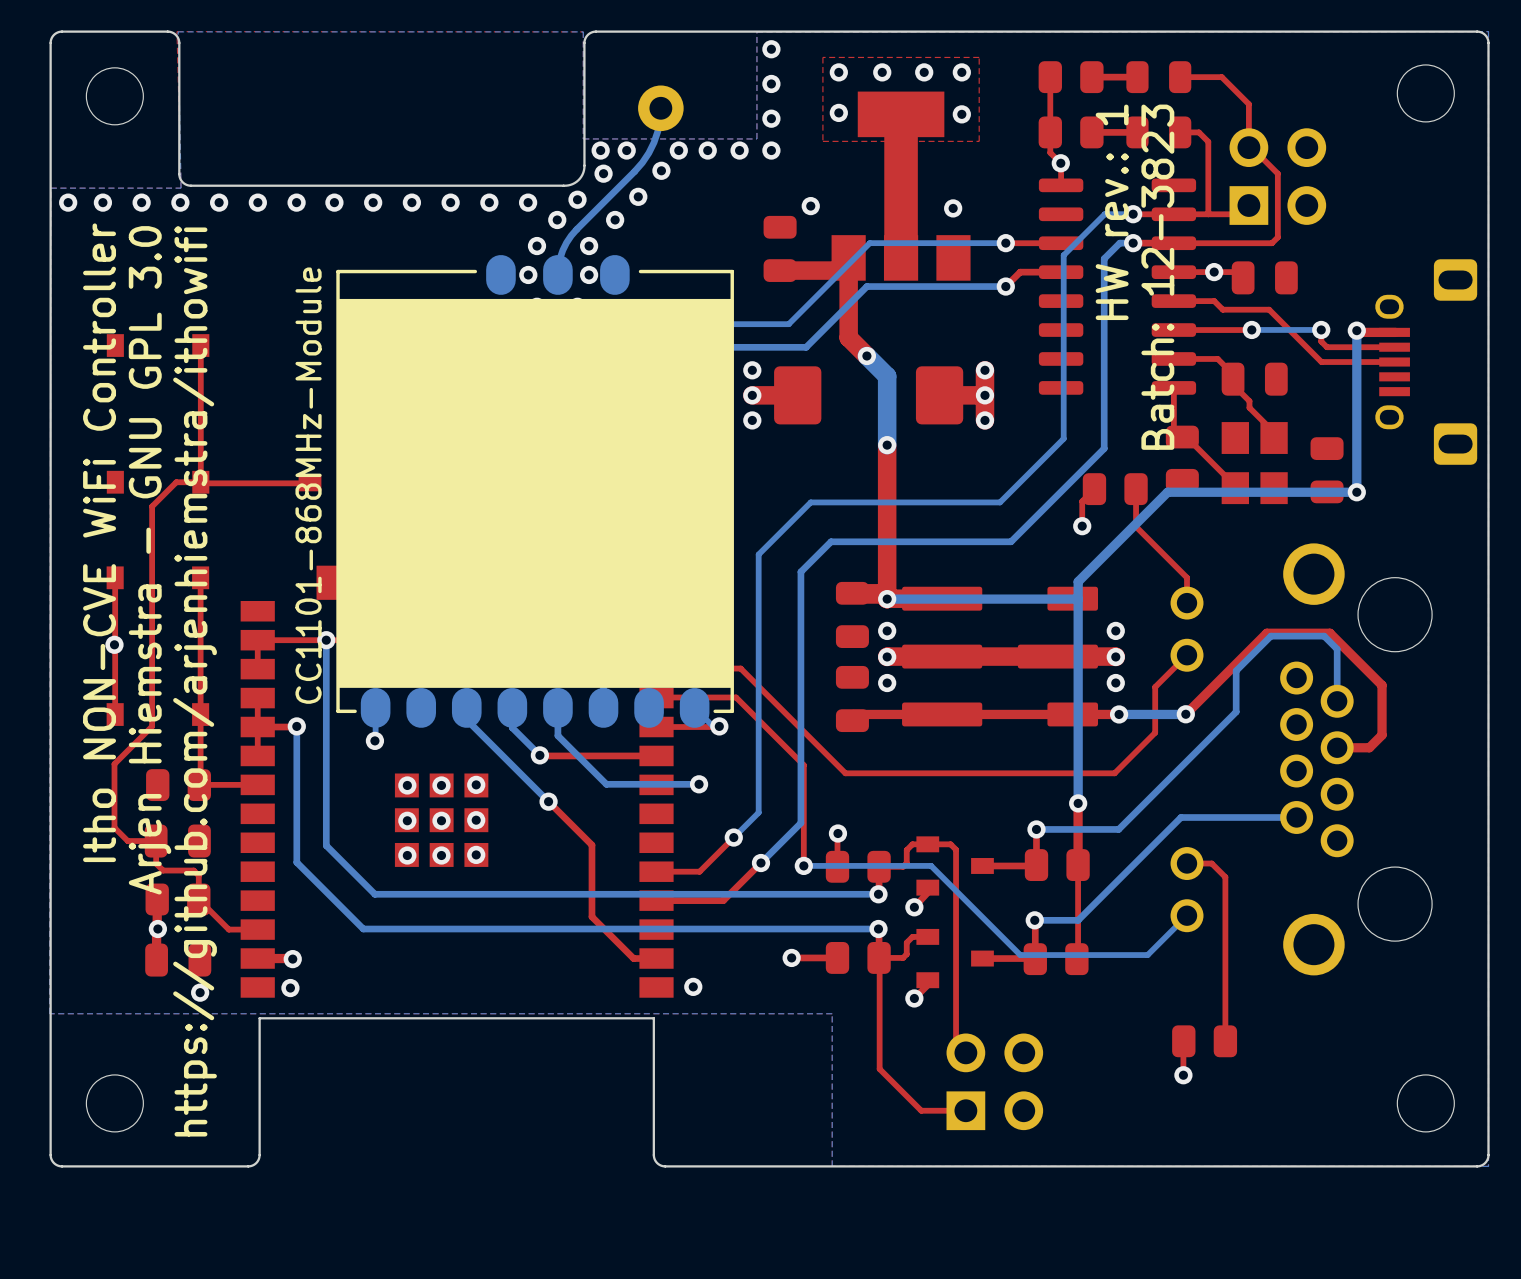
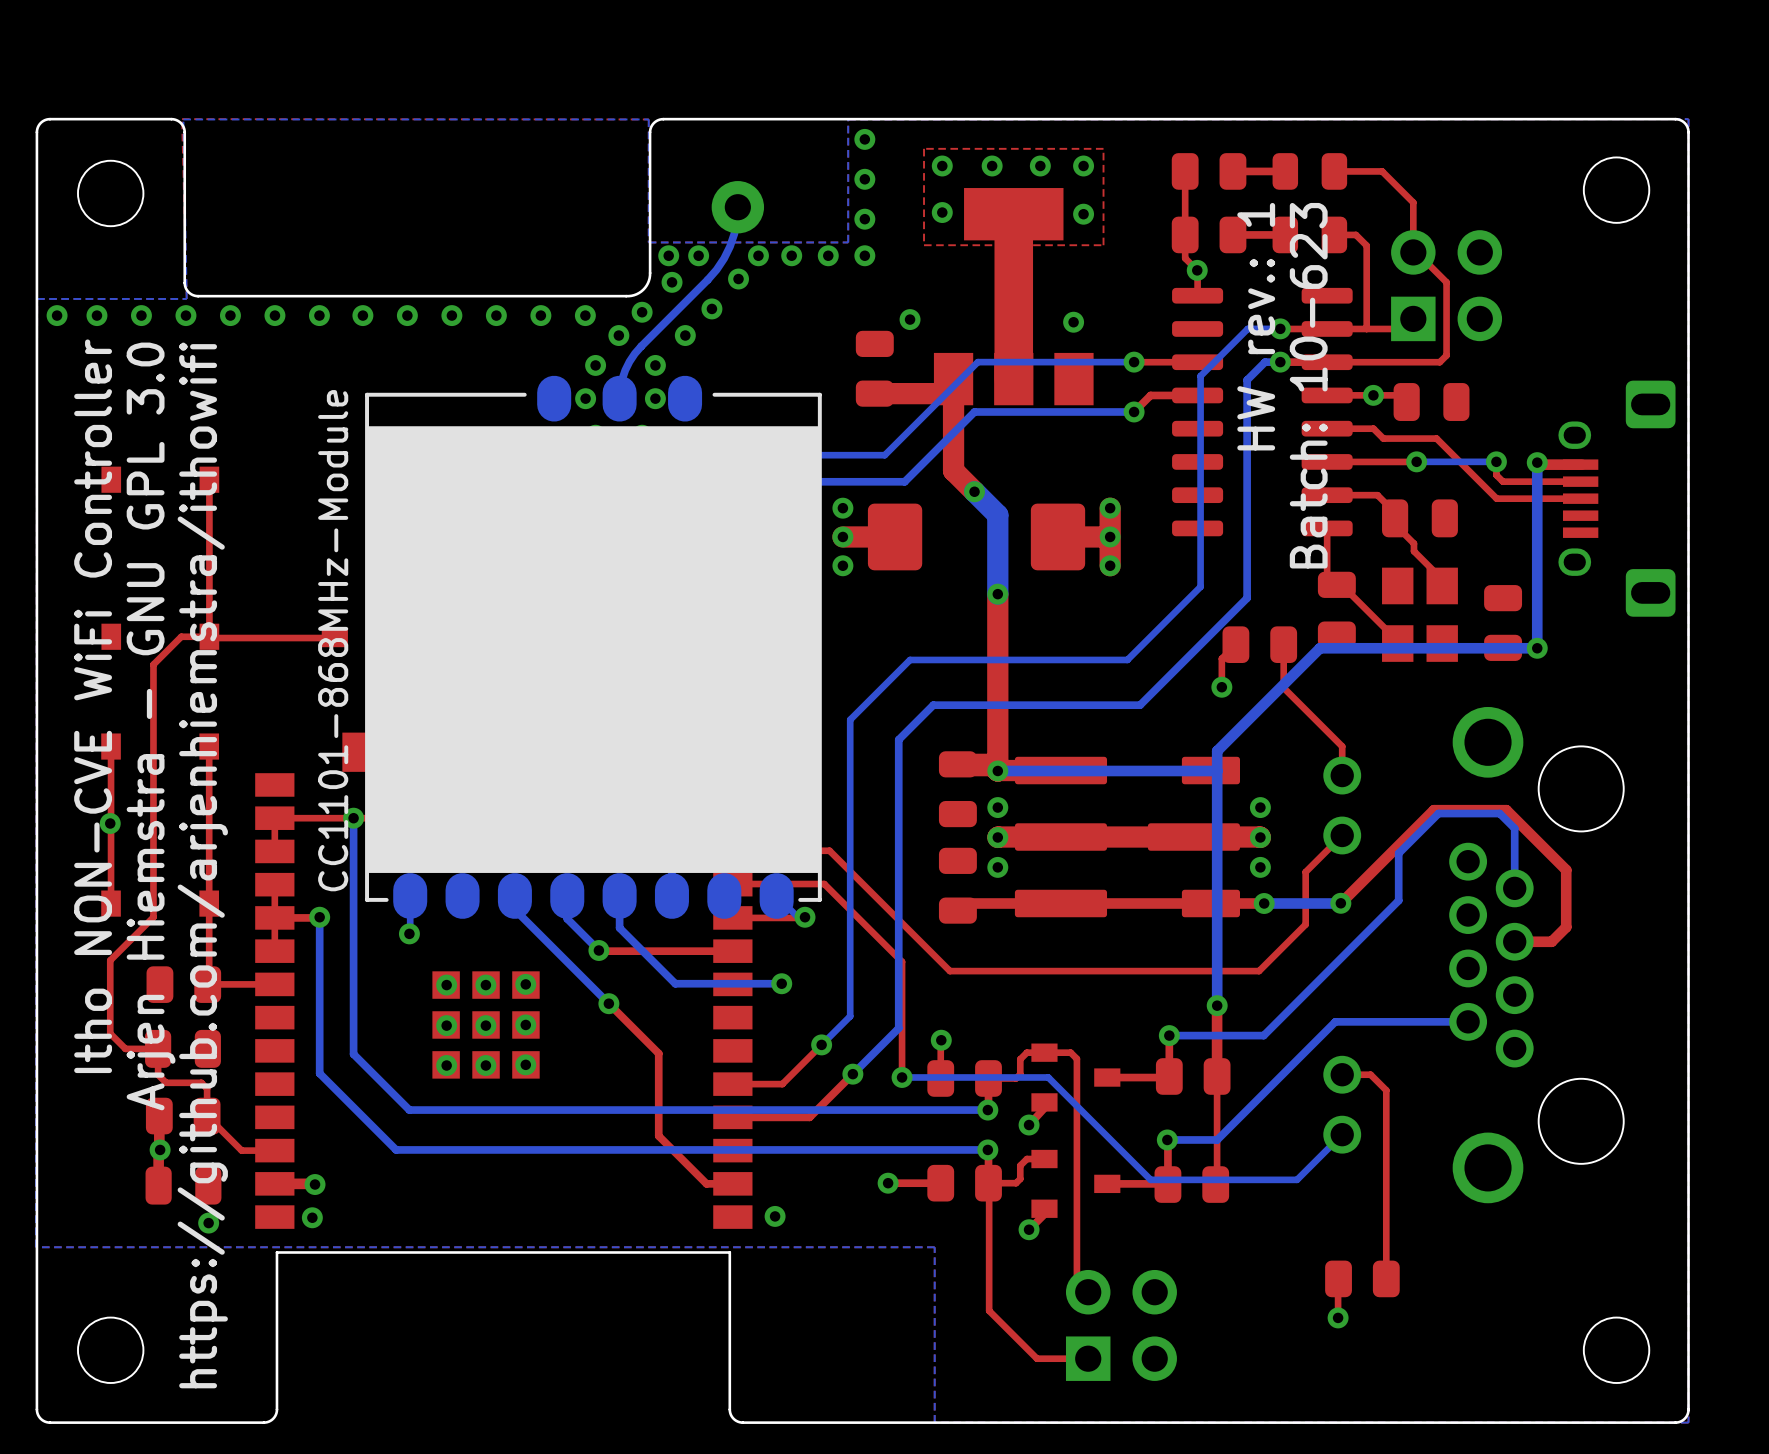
text: Batch: 12-3823 (1157, 277) -> Batch: 10-623 (1308, 385)

